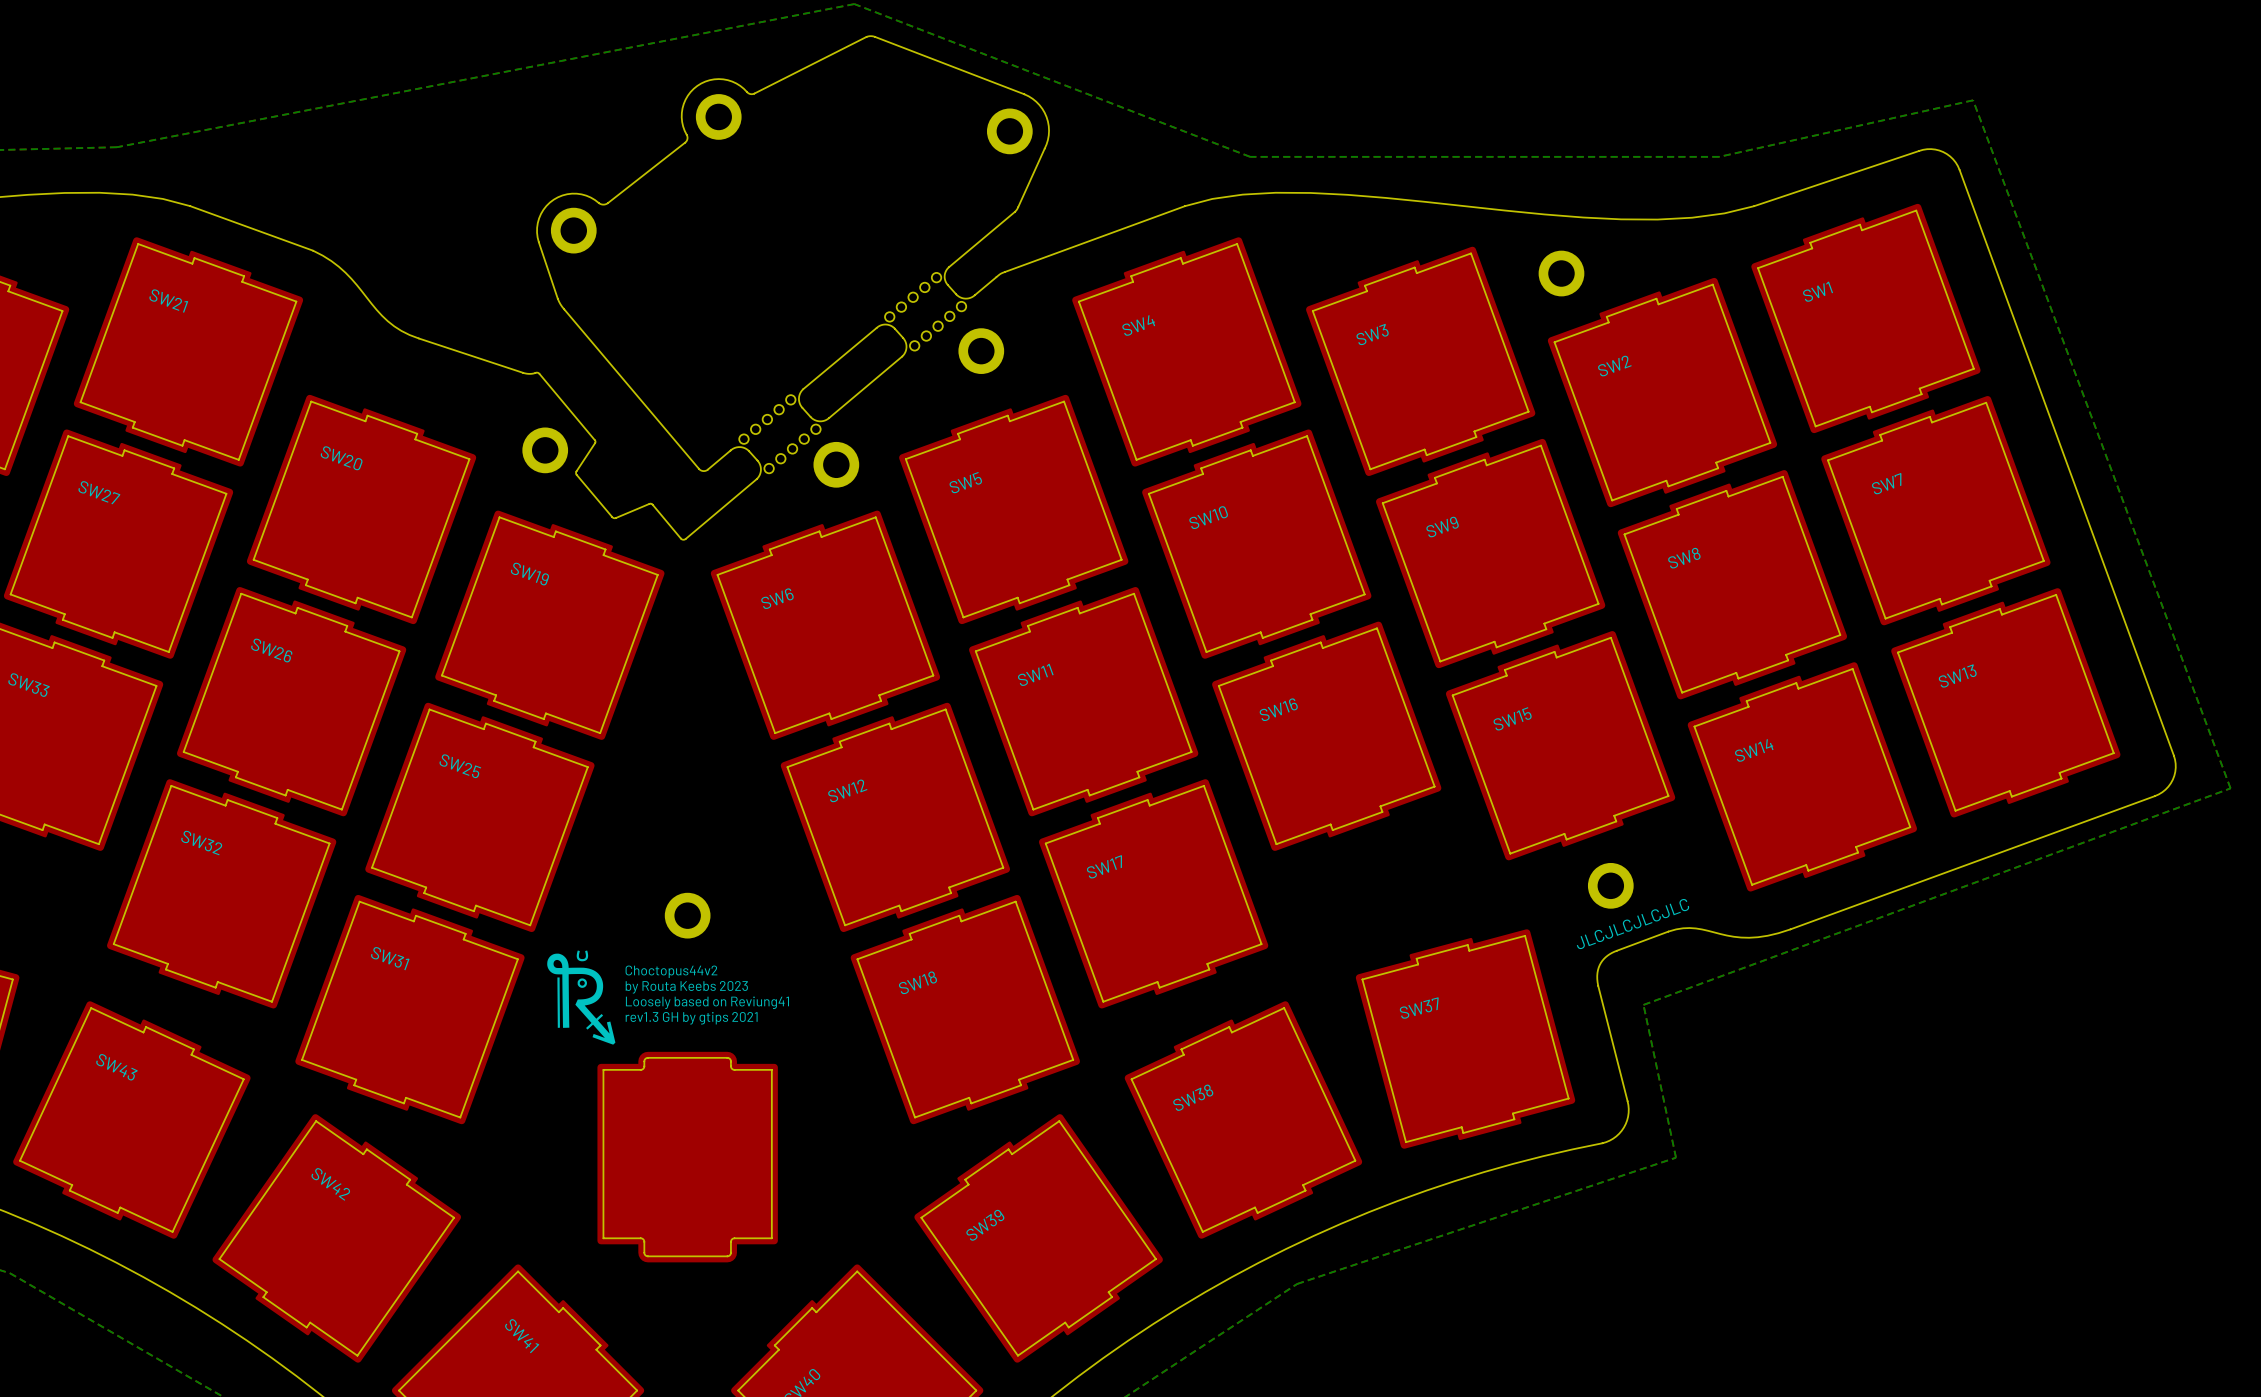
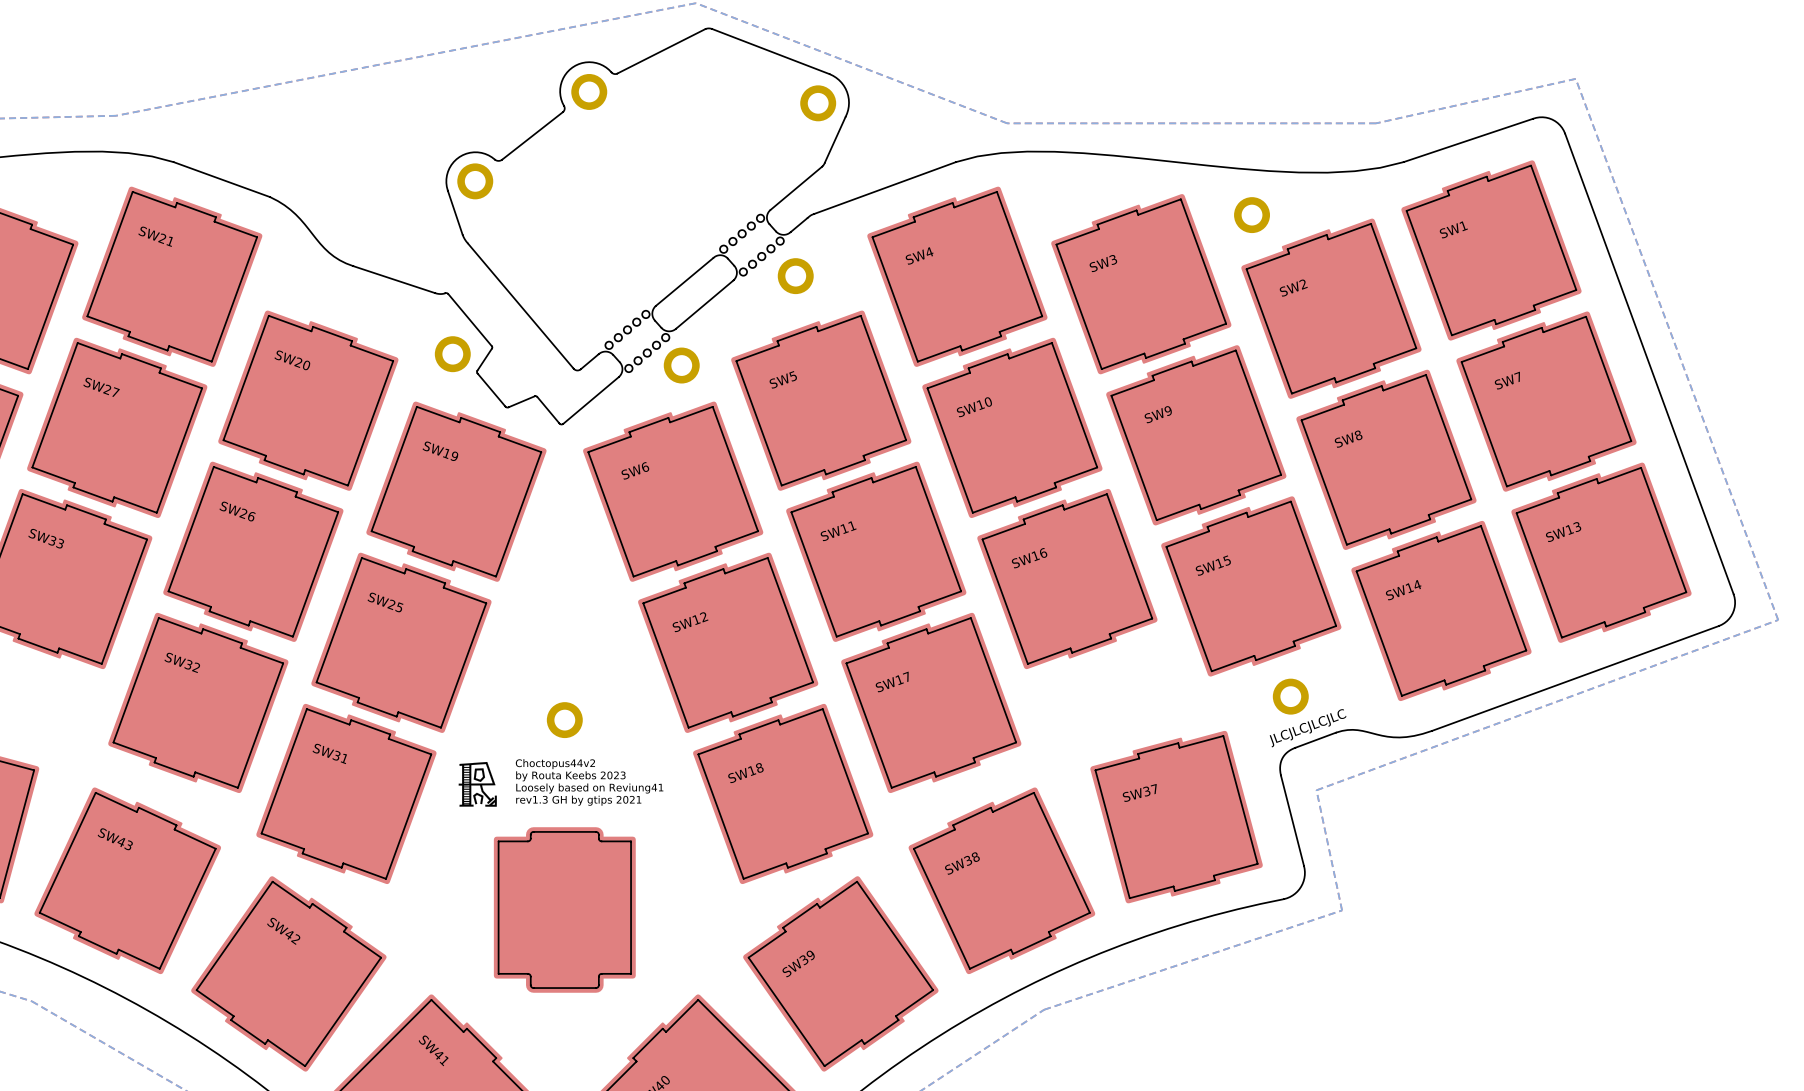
drawing shape: [547, 950, 616, 1045] -> [458, 761, 497, 807]

